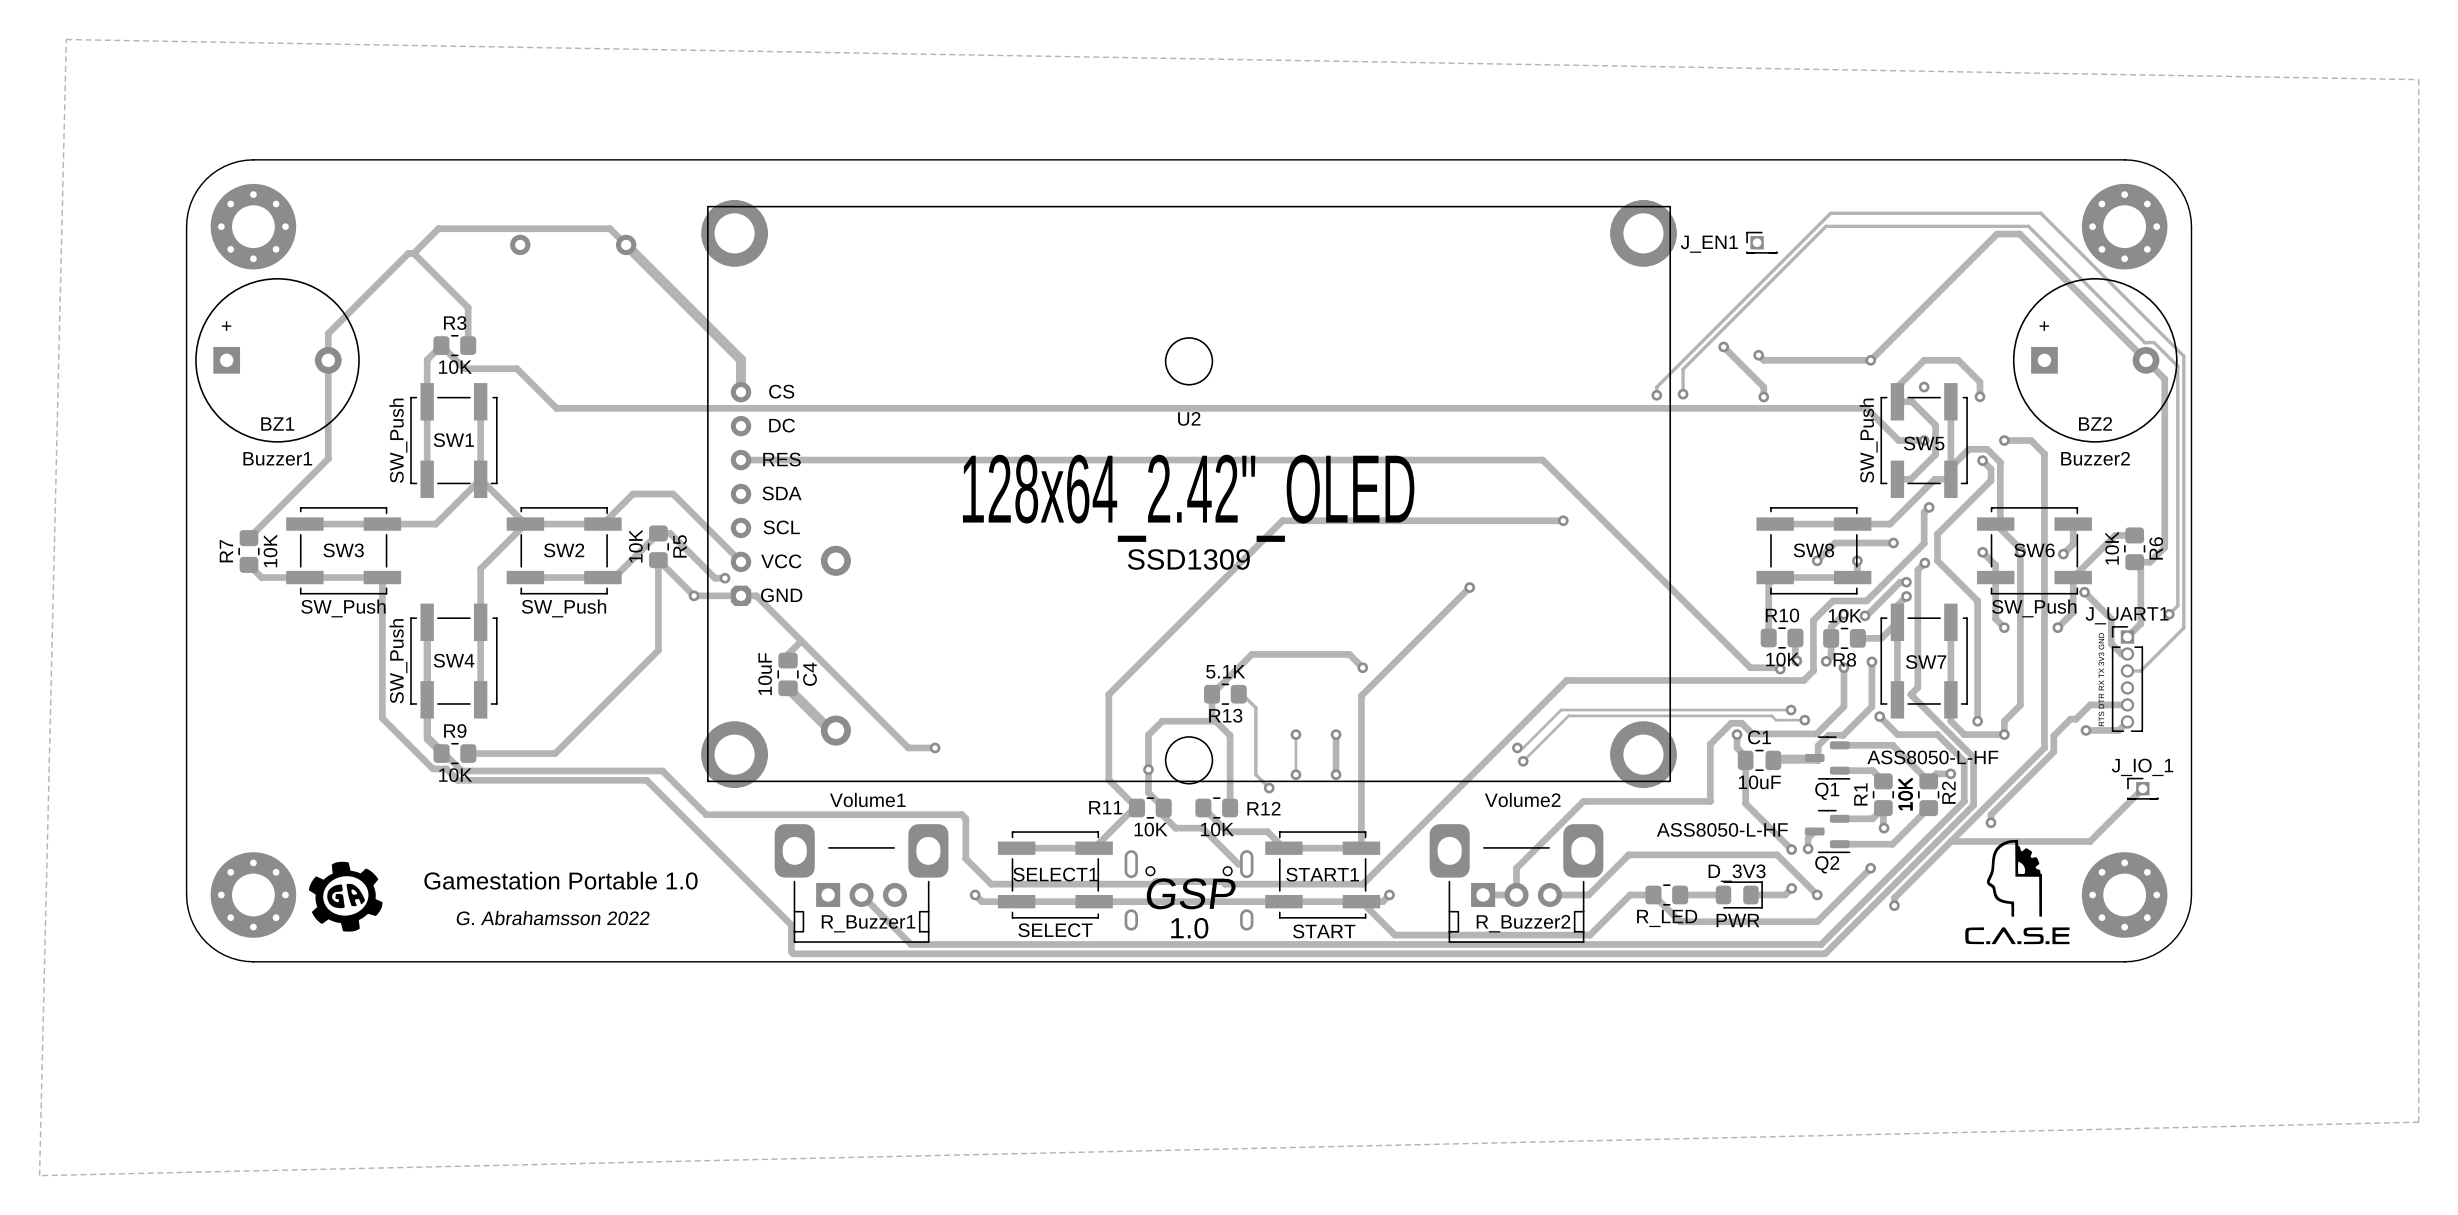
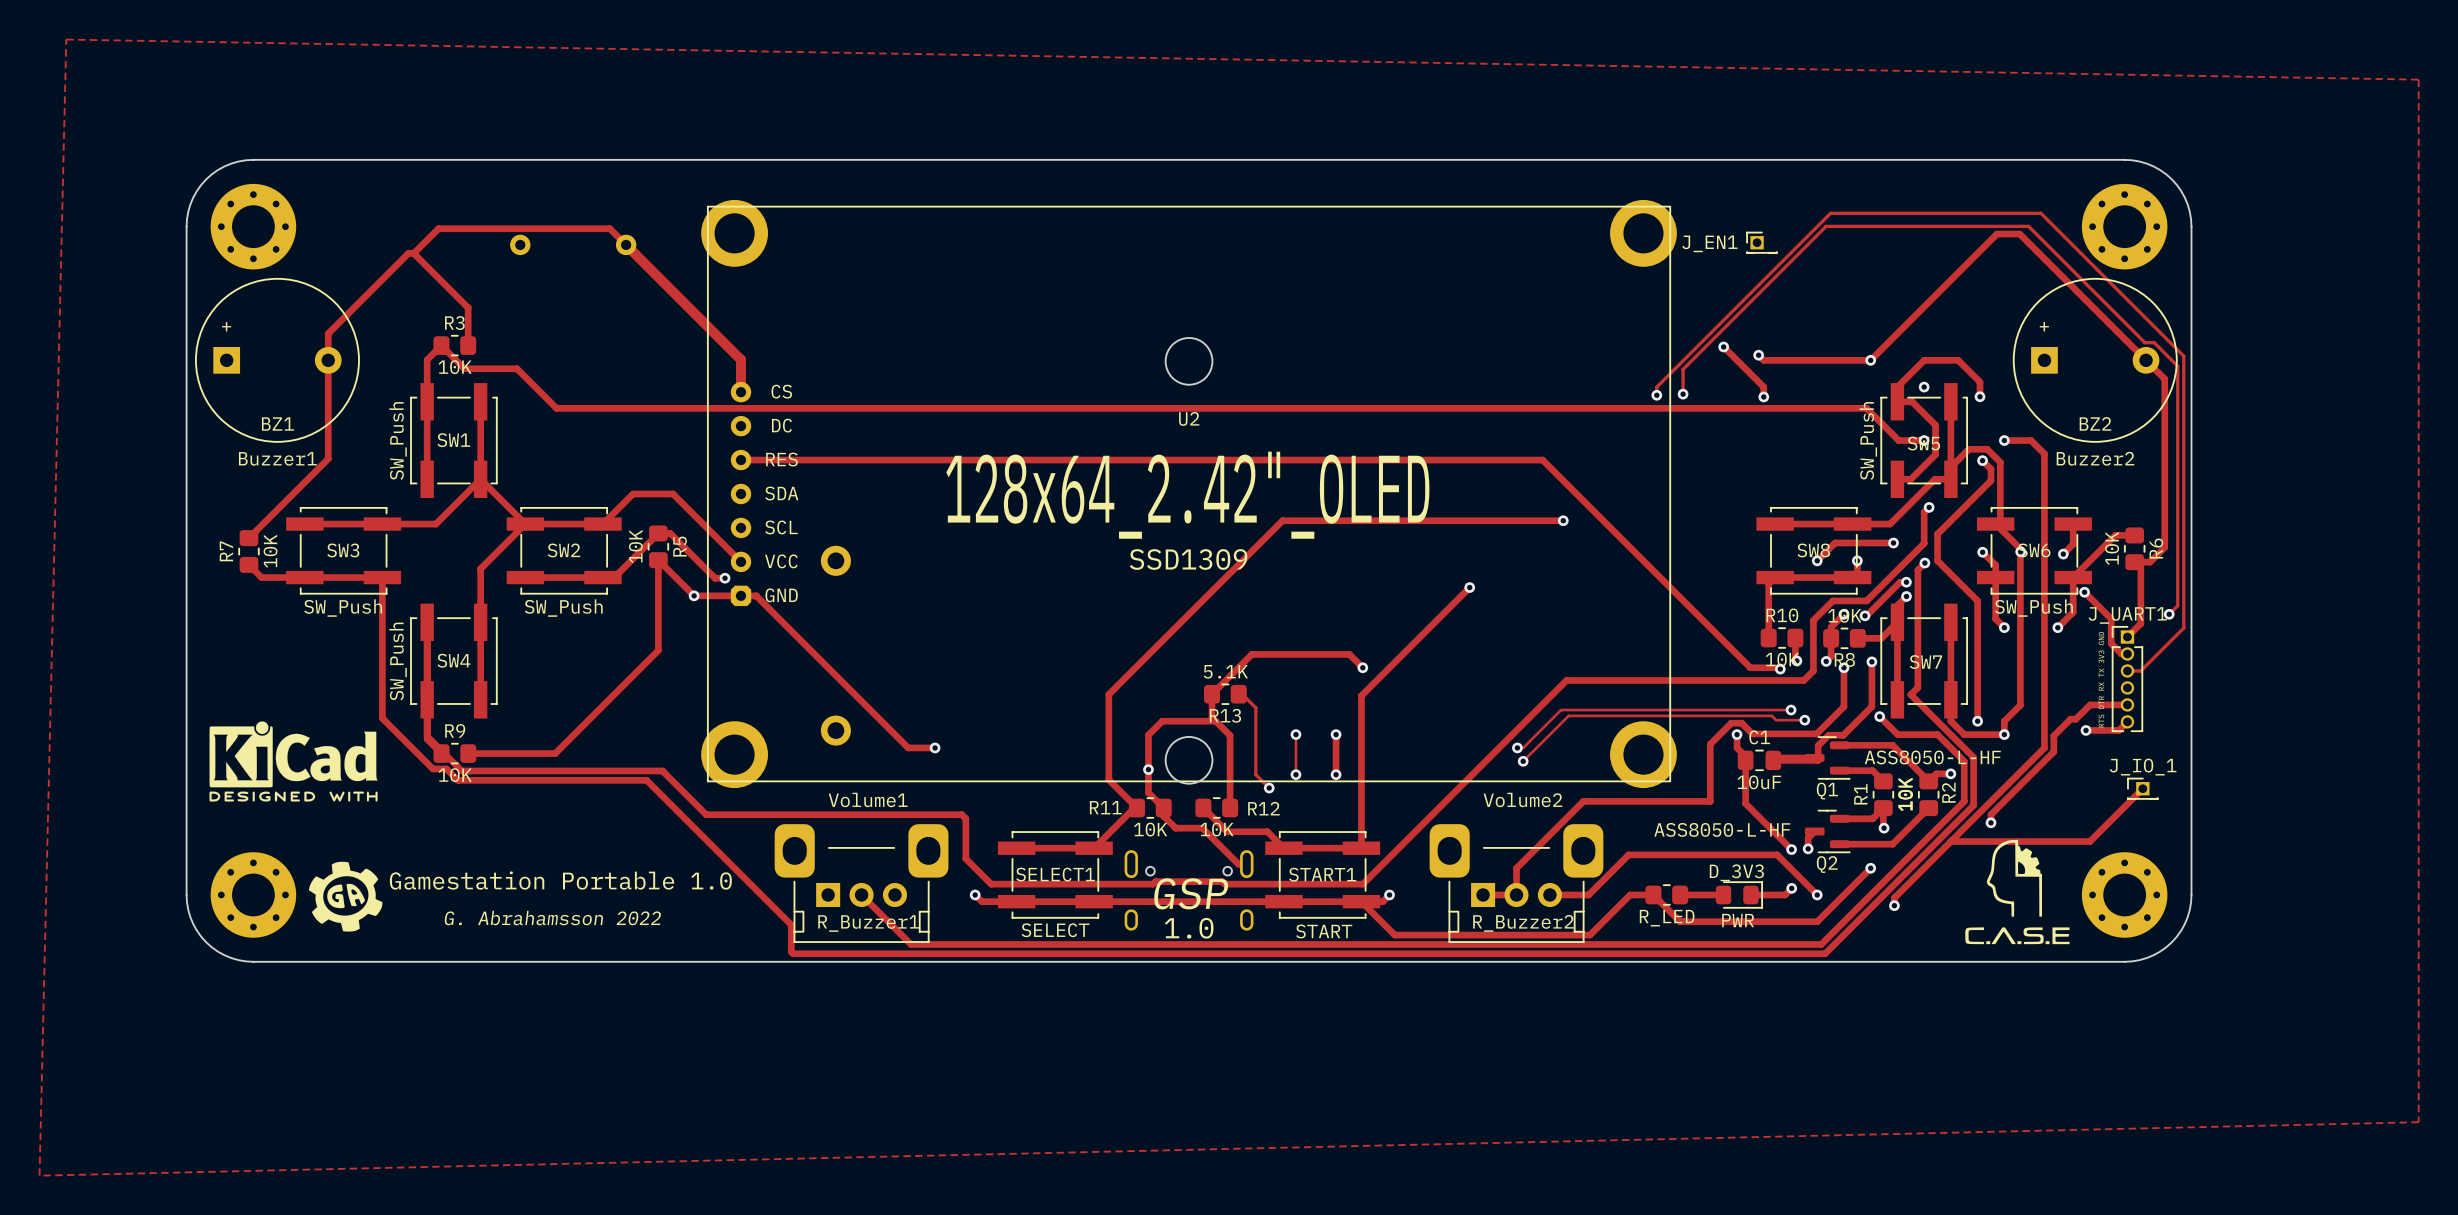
track: (801, 641) (788, 654) (788, 660) -> none
C4: 10uF (788, 674) -> none
track: (788, 688) (830, 730) (835, 730) -> none
drawing: none -> [209, 721, 378, 802]

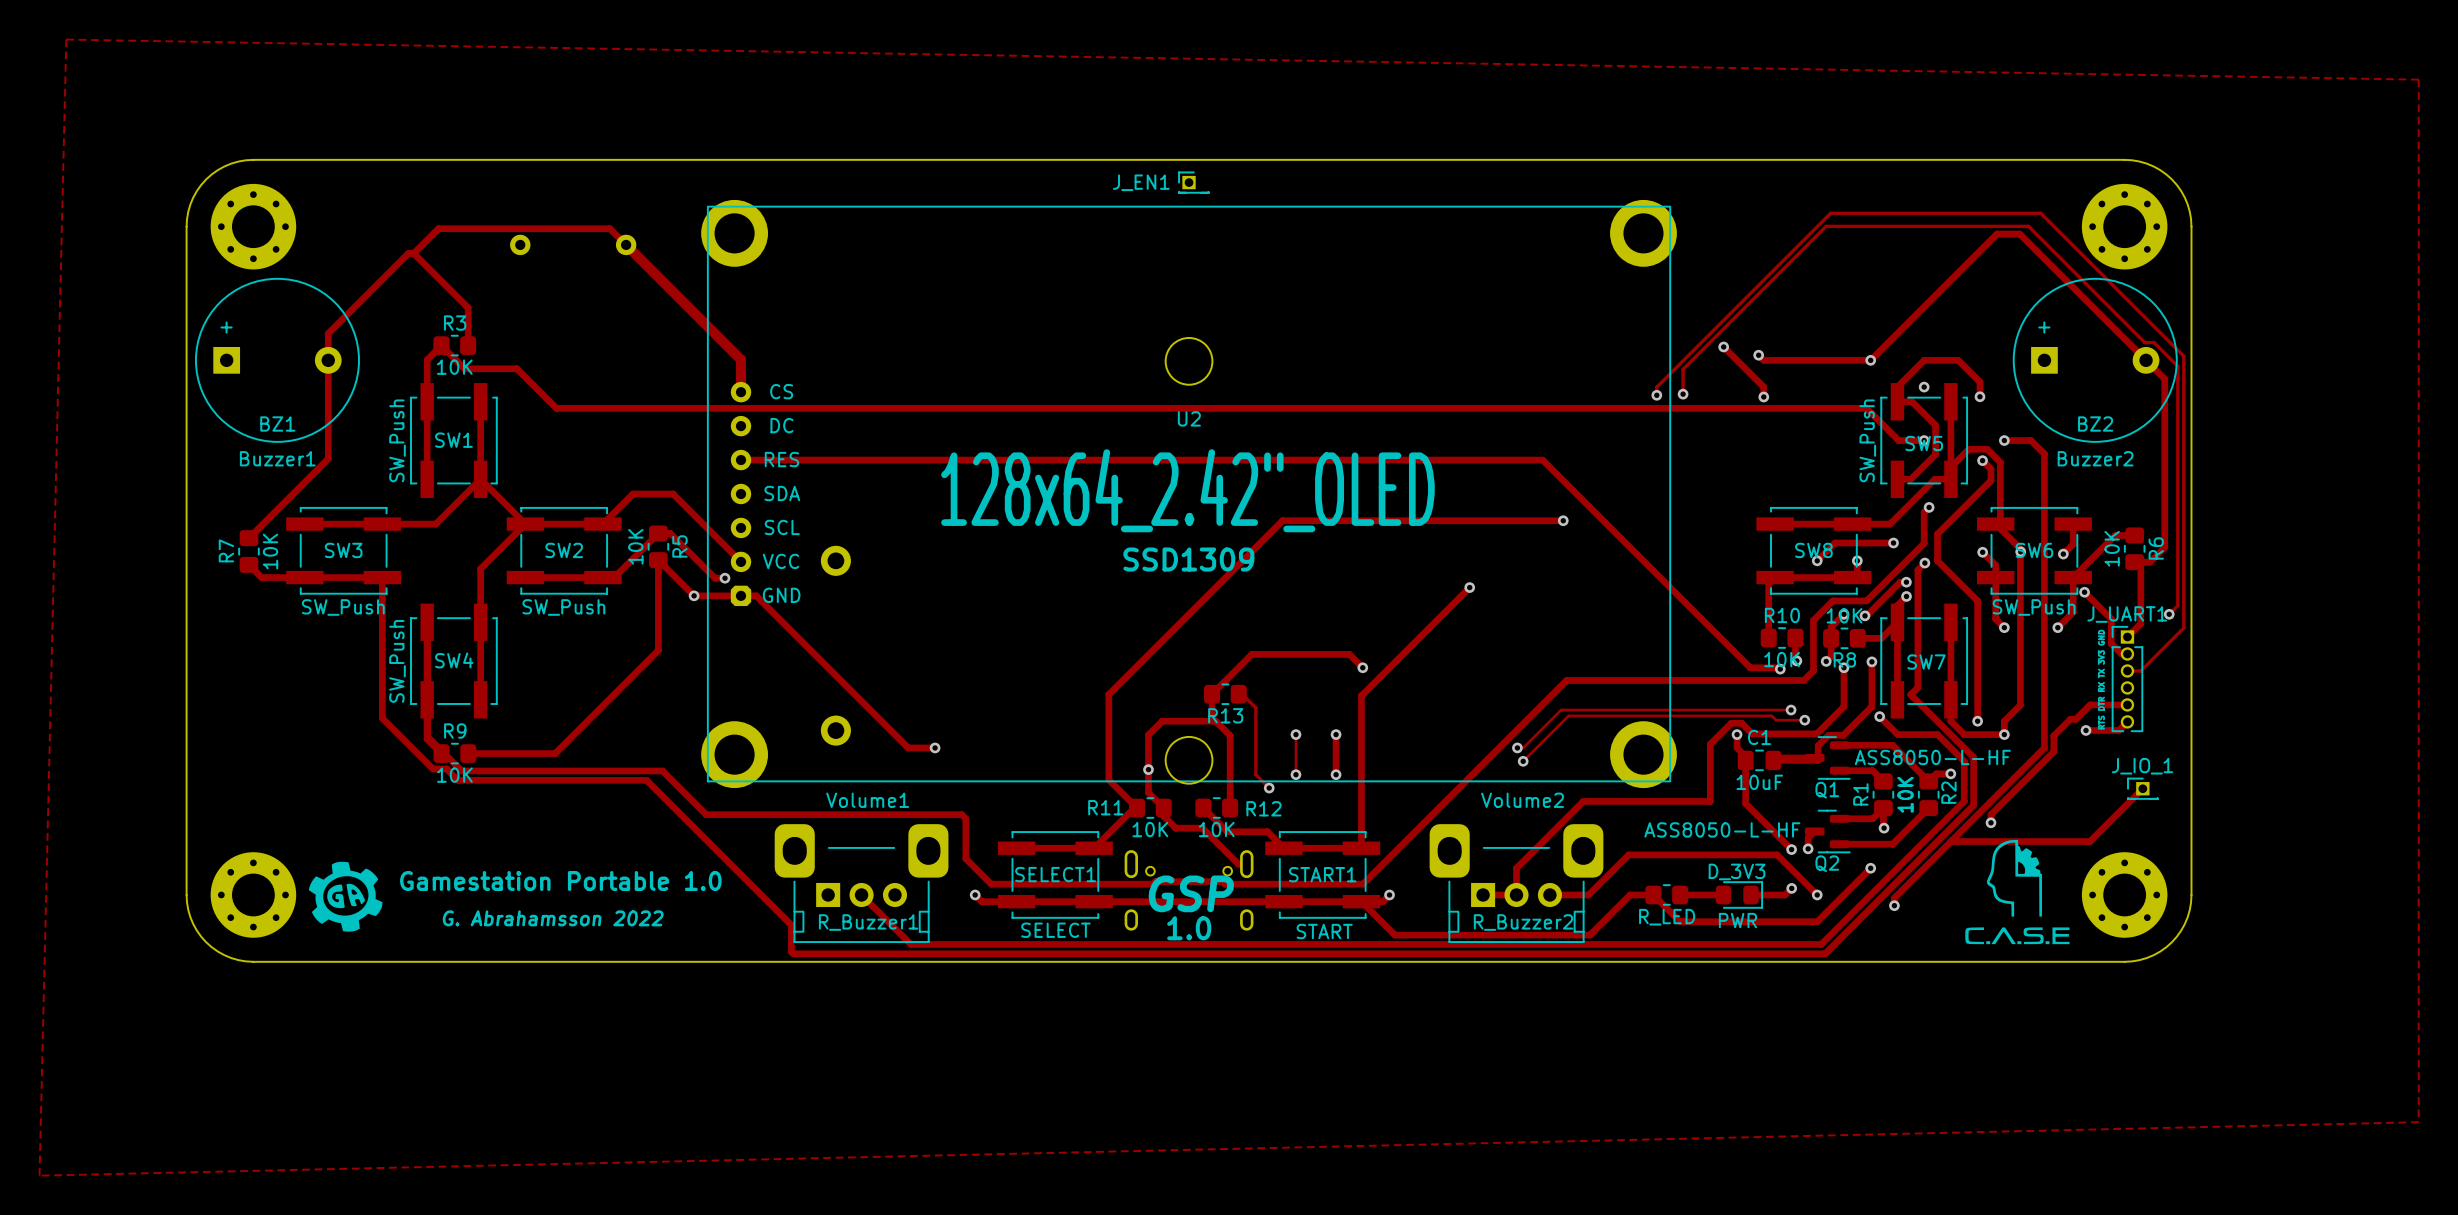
J_EN1 position: (1761, 242) -> (1193, 182)
R13 value: 5.1K (1225, 671) -> none
drawing: [209, 721, 378, 802] -> none

